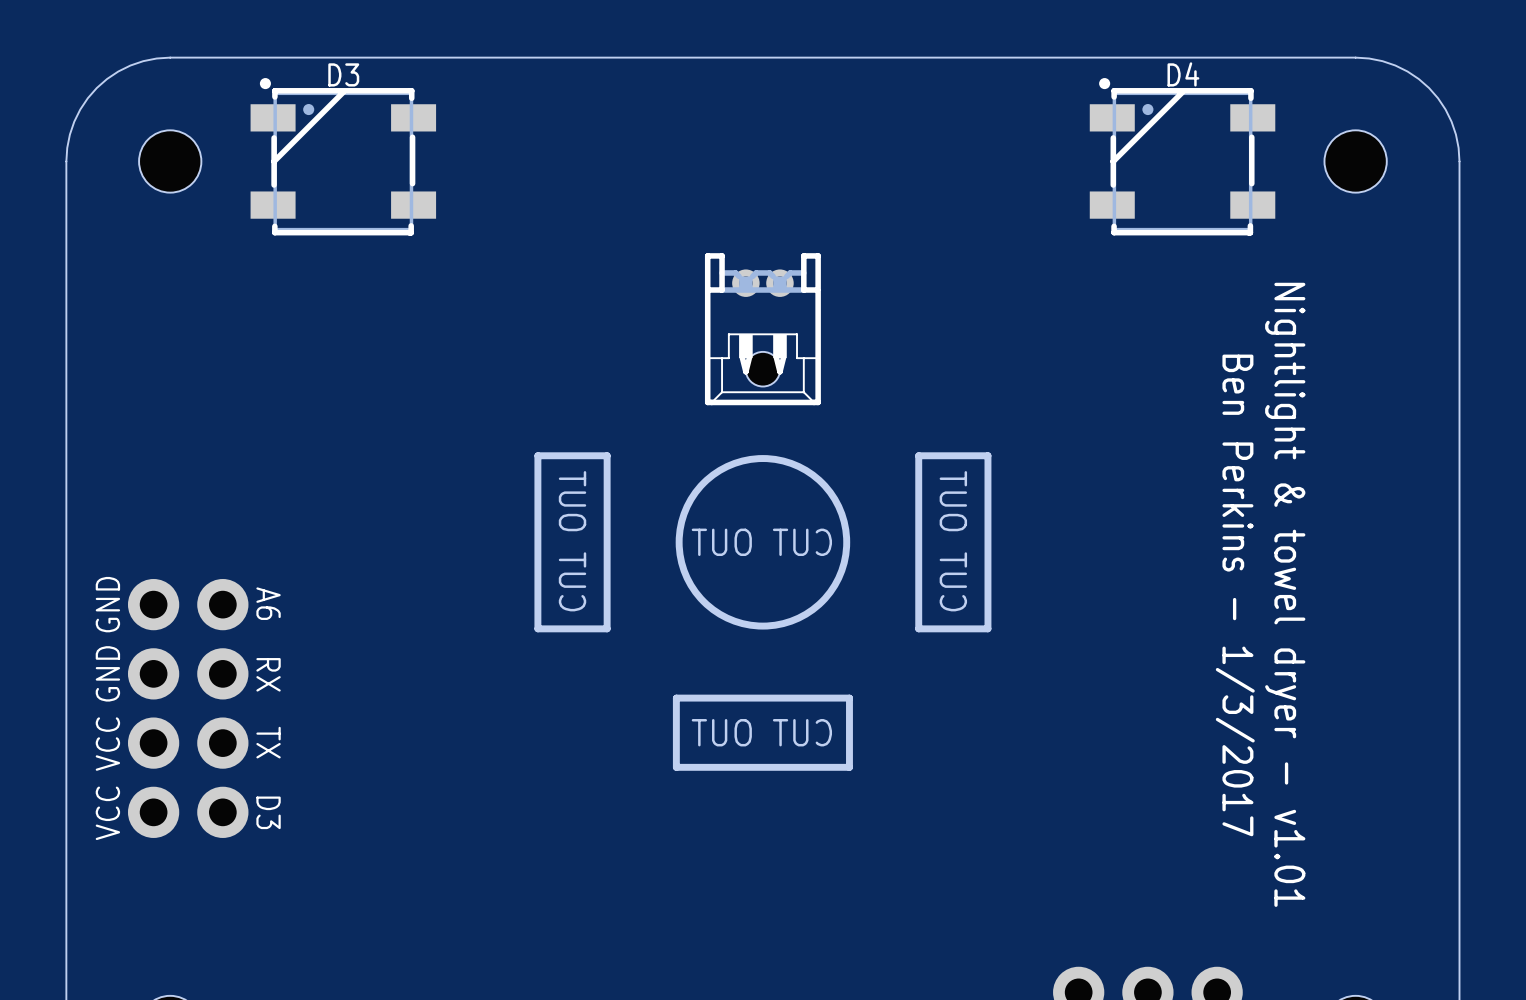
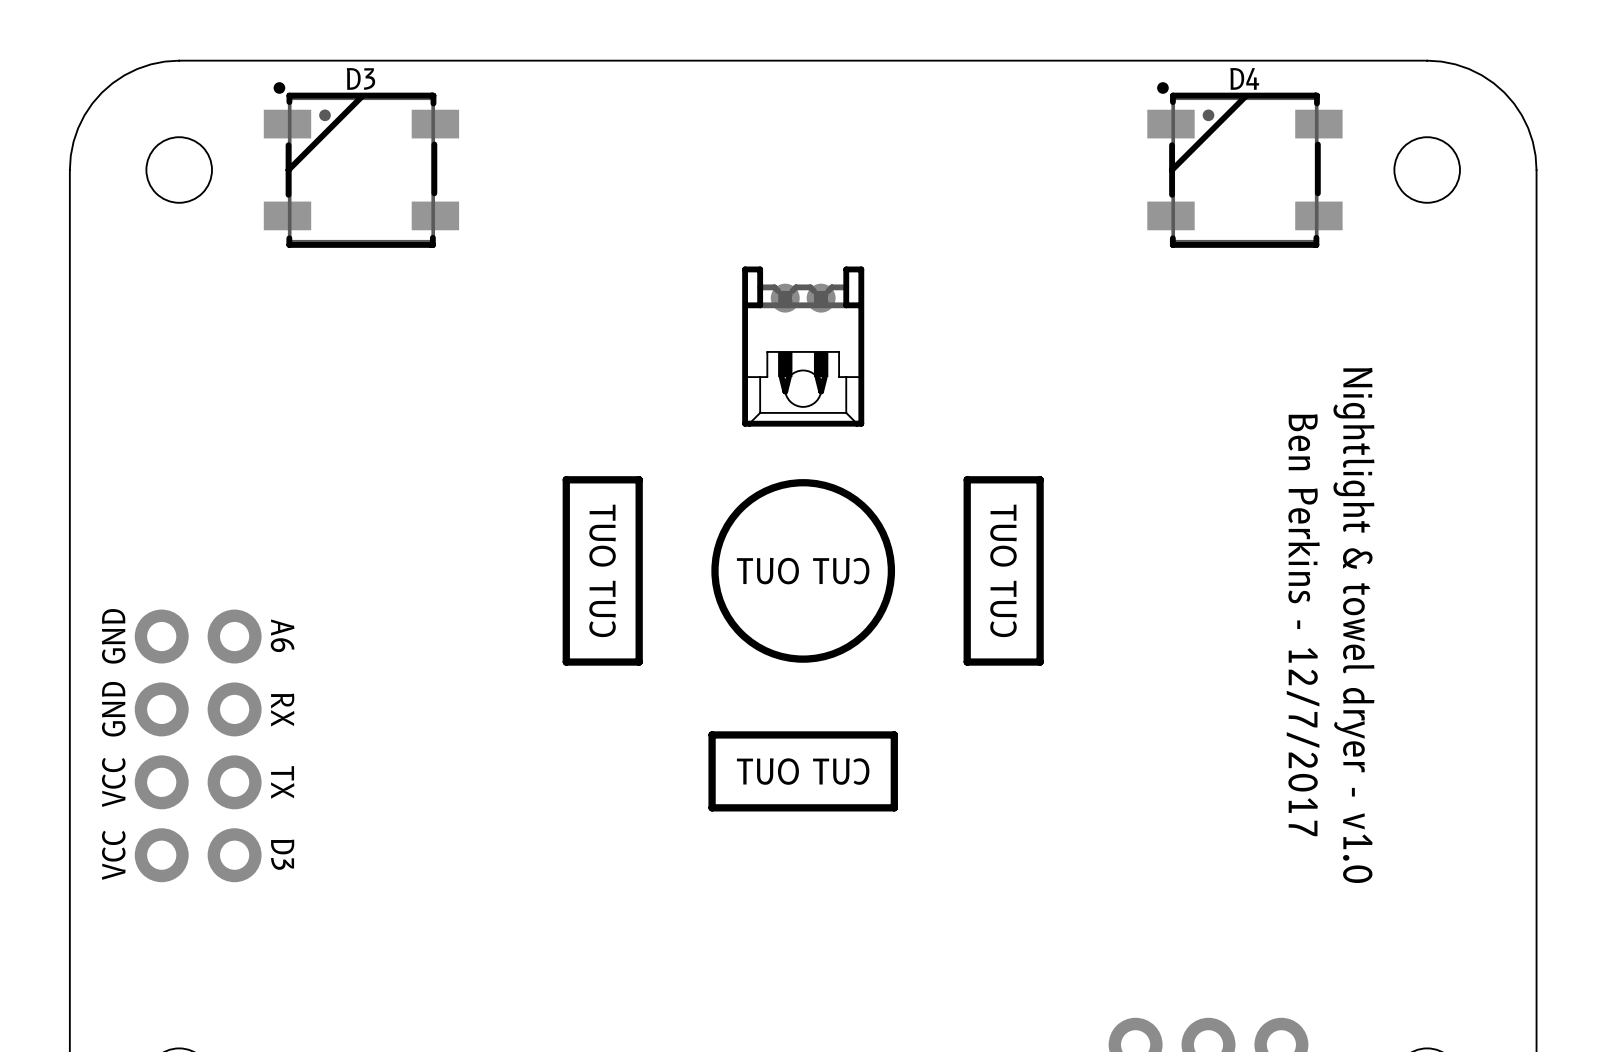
text: Nightlight & towel dryer - v1.01 (1285, 594) -> Nightlight & towel dryer - v1.0 (1353, 625)
text: Ben Perkins - 1/3/2017 (1235, 595) -> Ben Perkins - 12/7/2017 (1303, 625)

